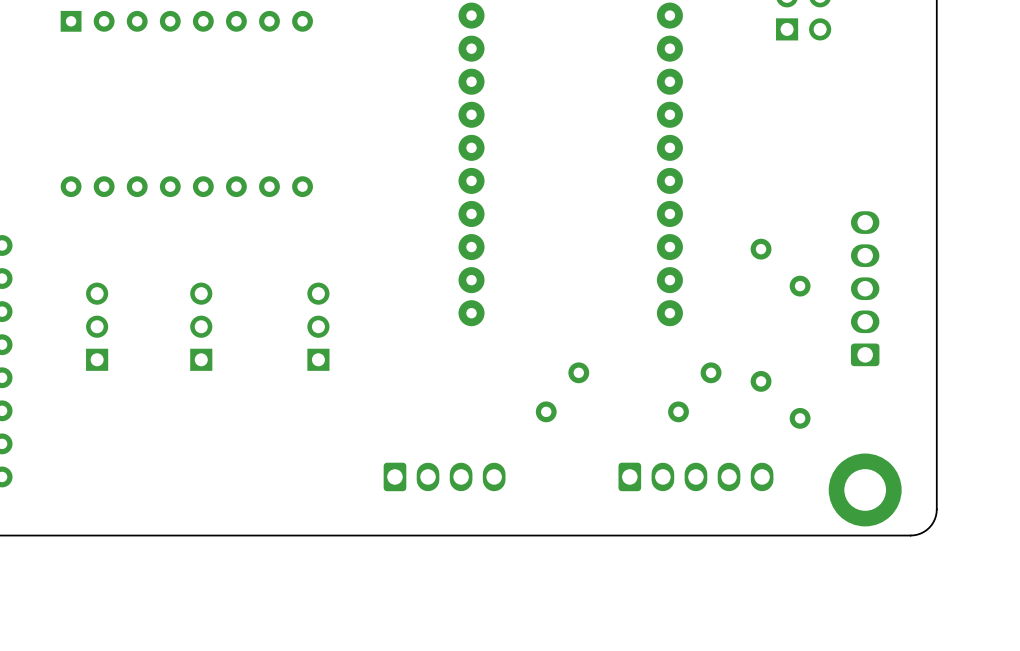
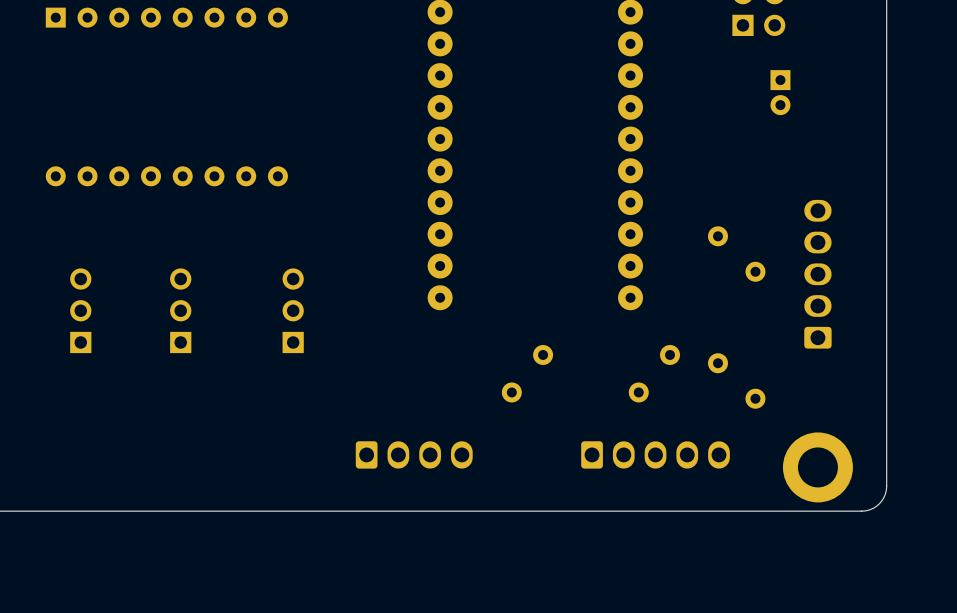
part: none -> (780, 92)

